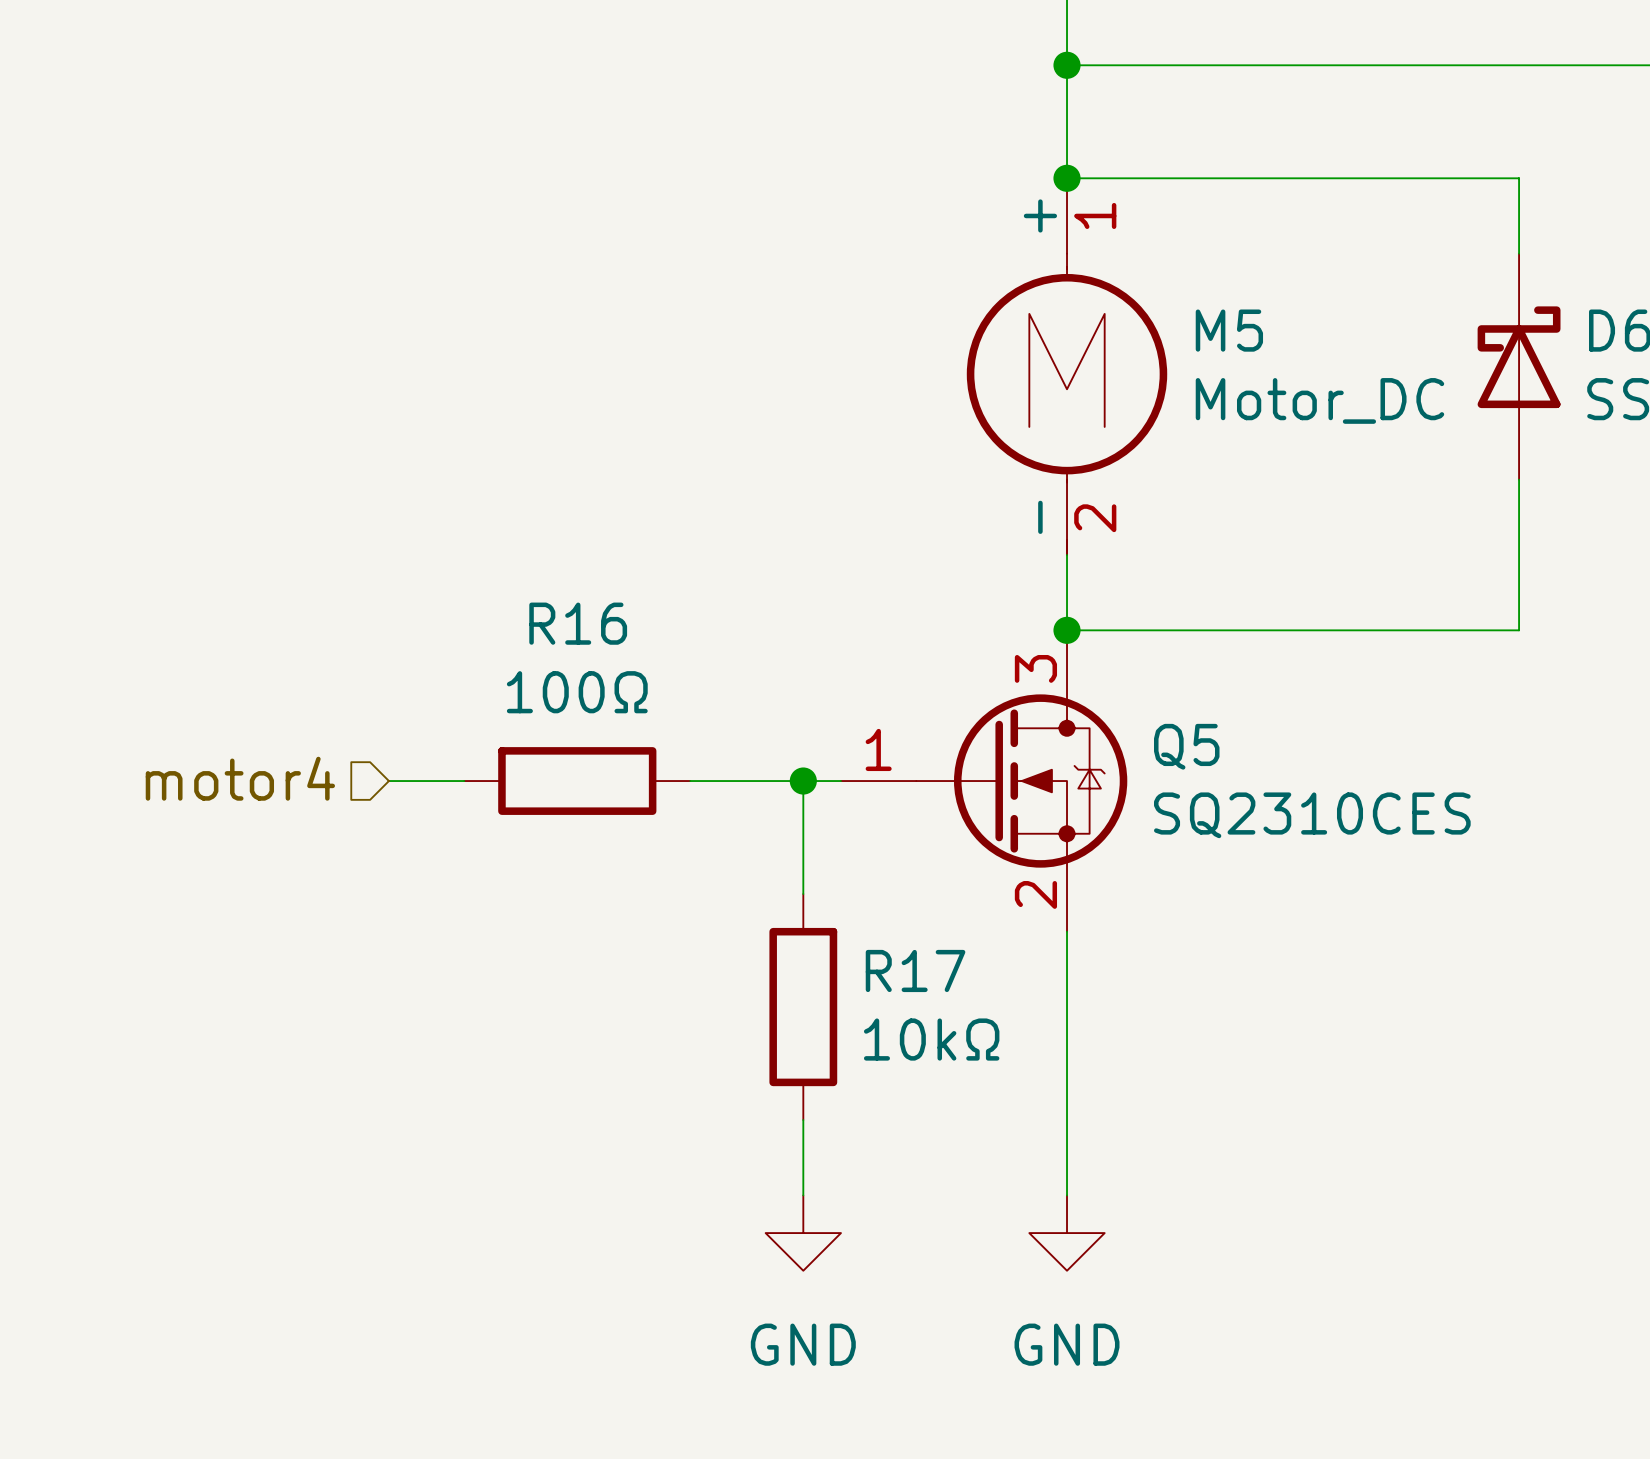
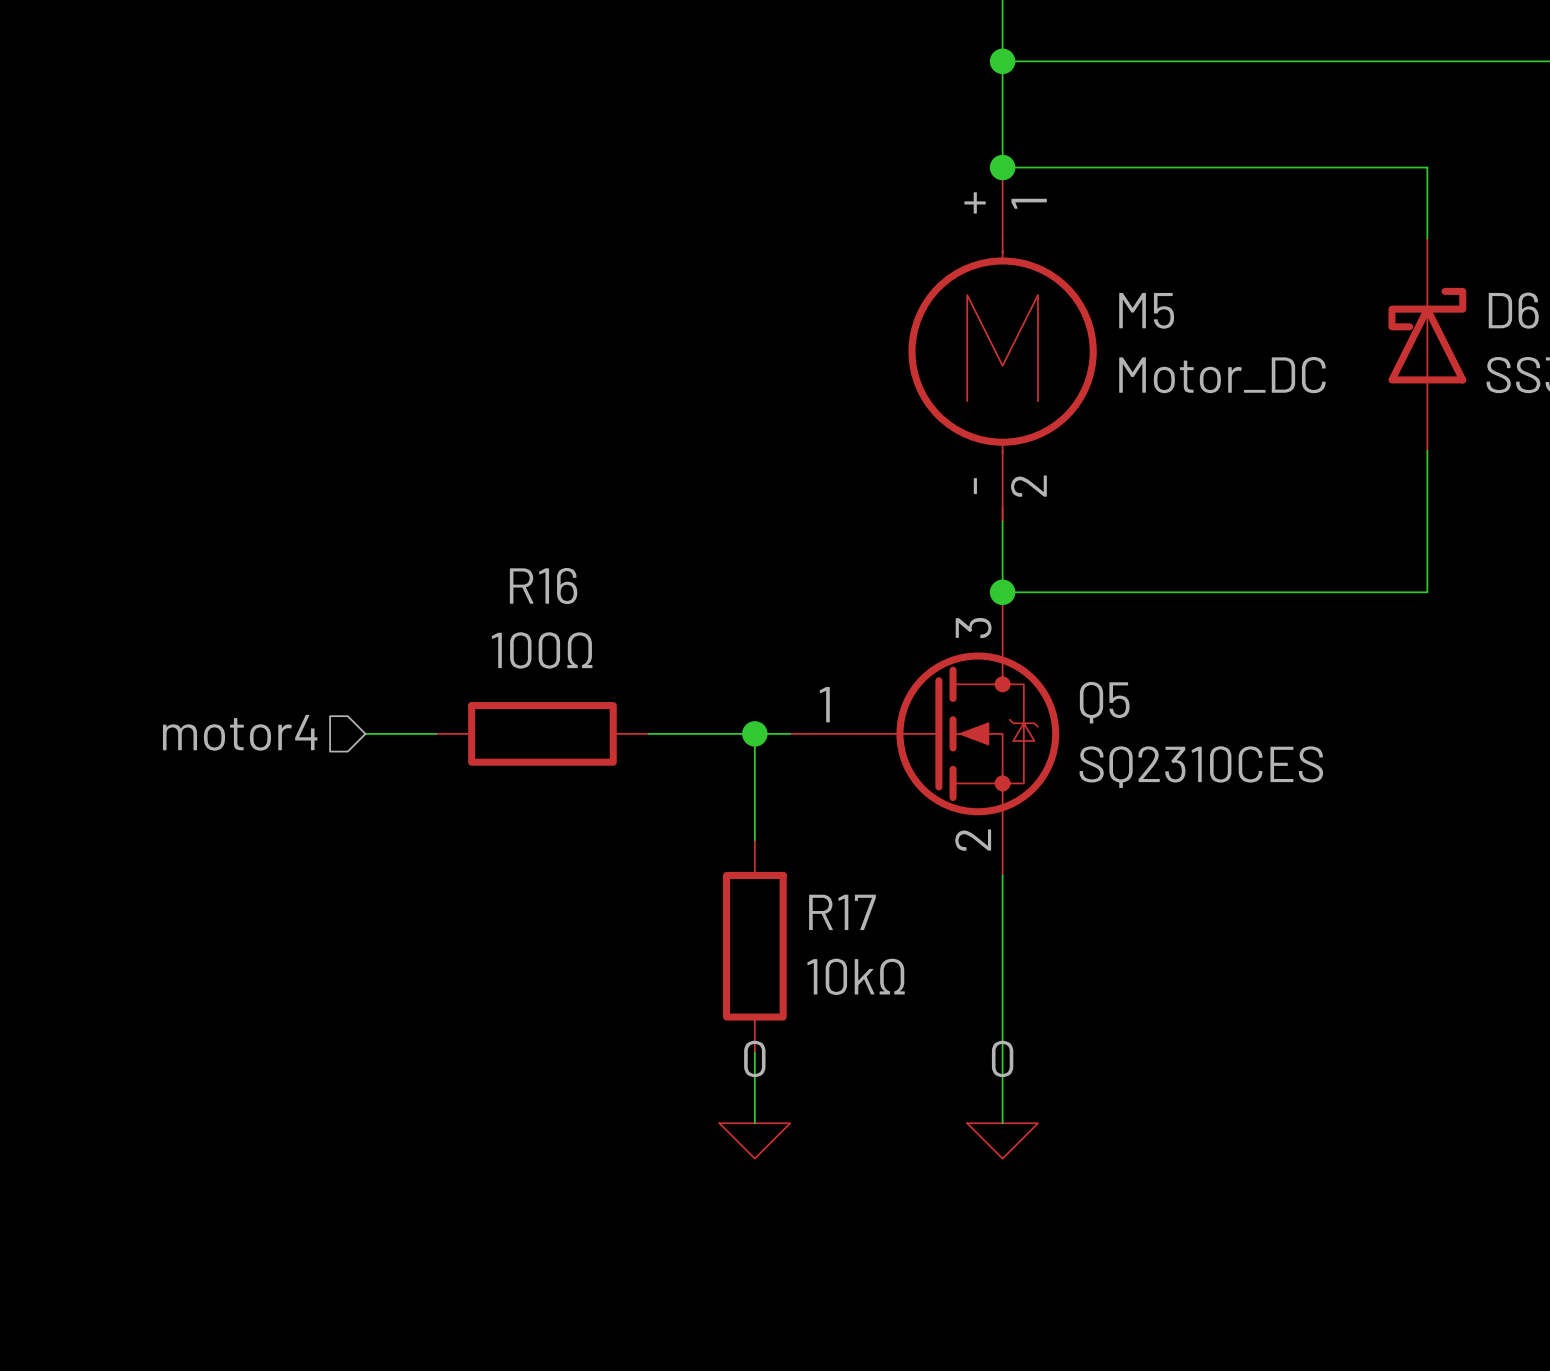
power symbol: GND (803, 1233) -> 0 (754, 1140)
power symbol: GND (1067, 1233) -> 0 (1002, 1140)

